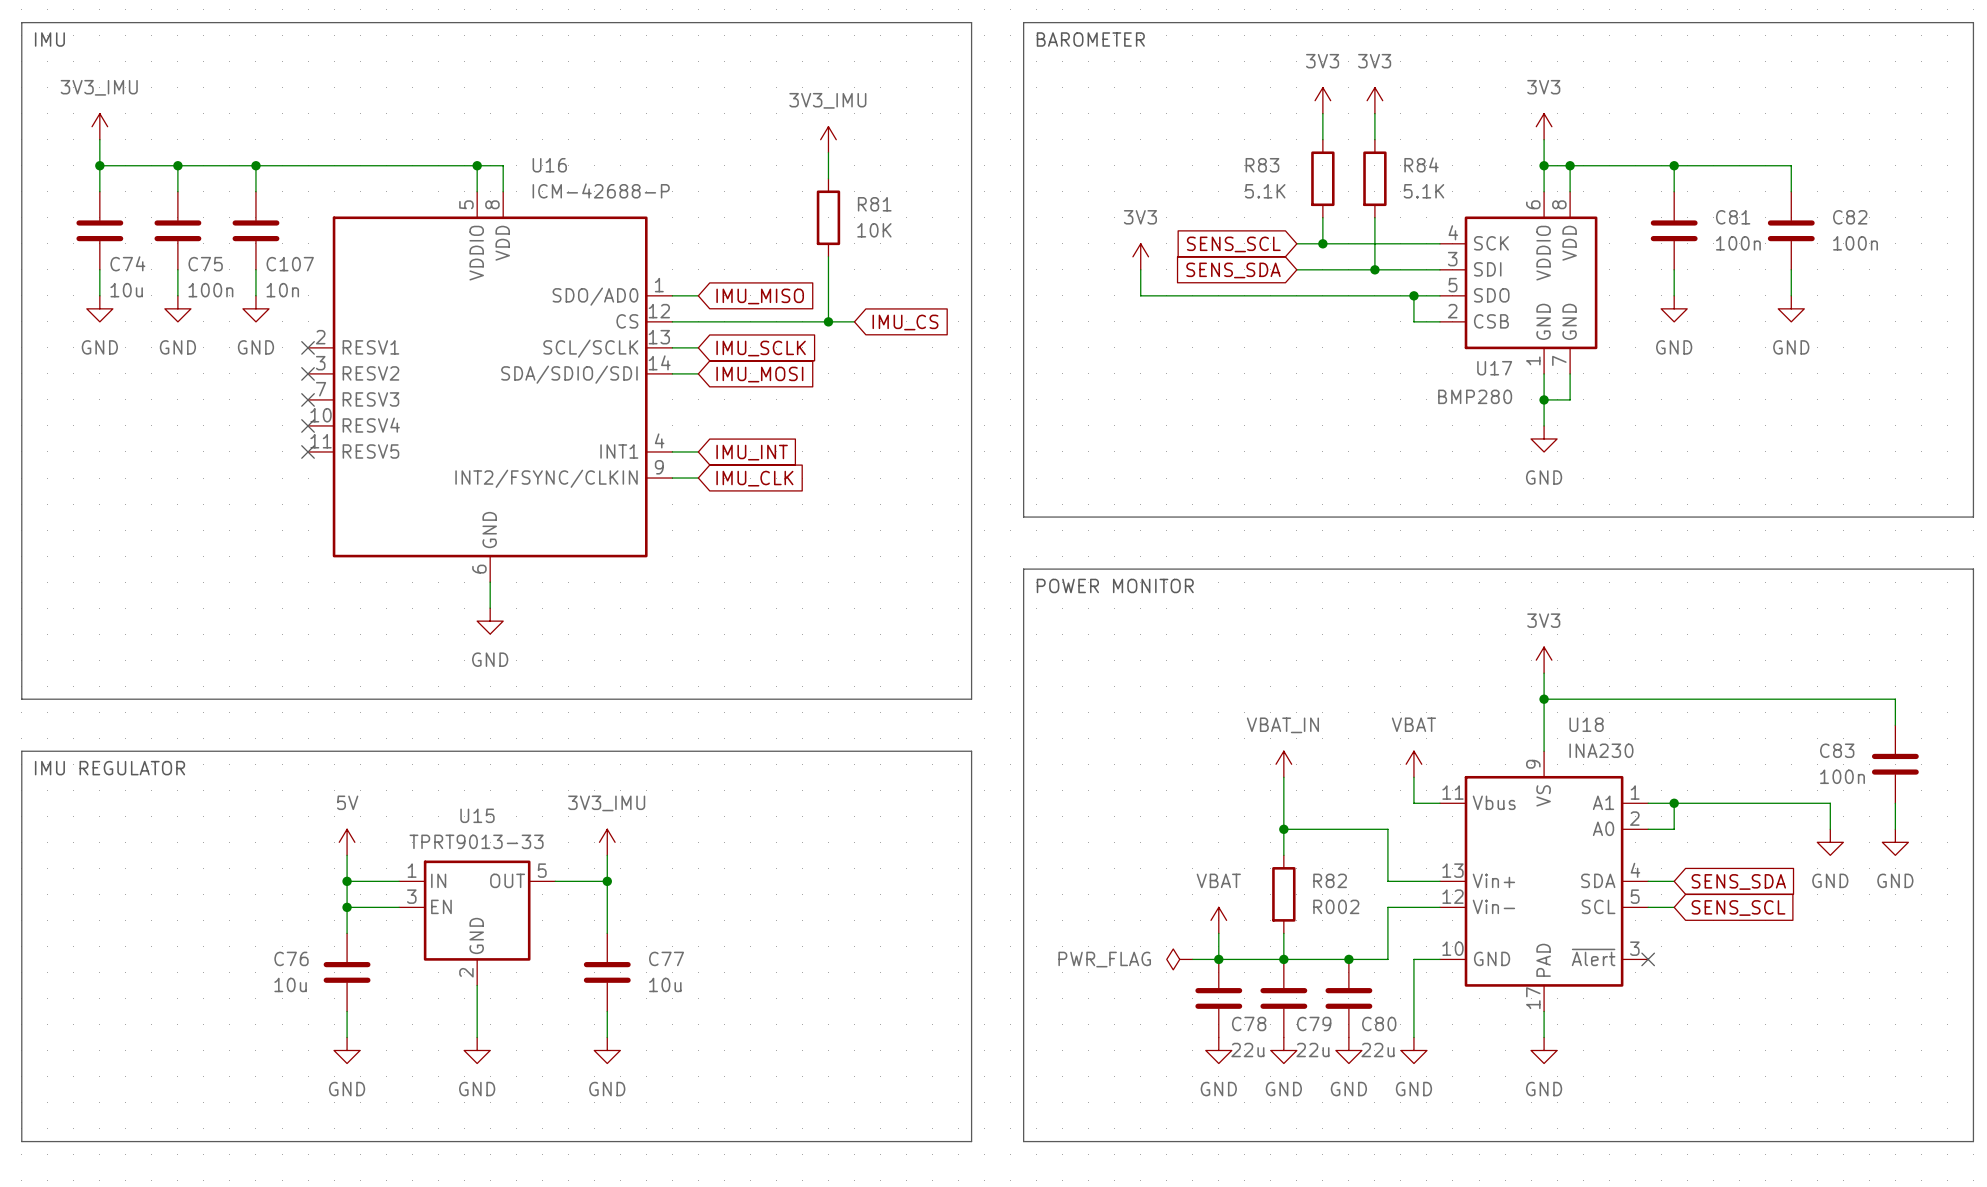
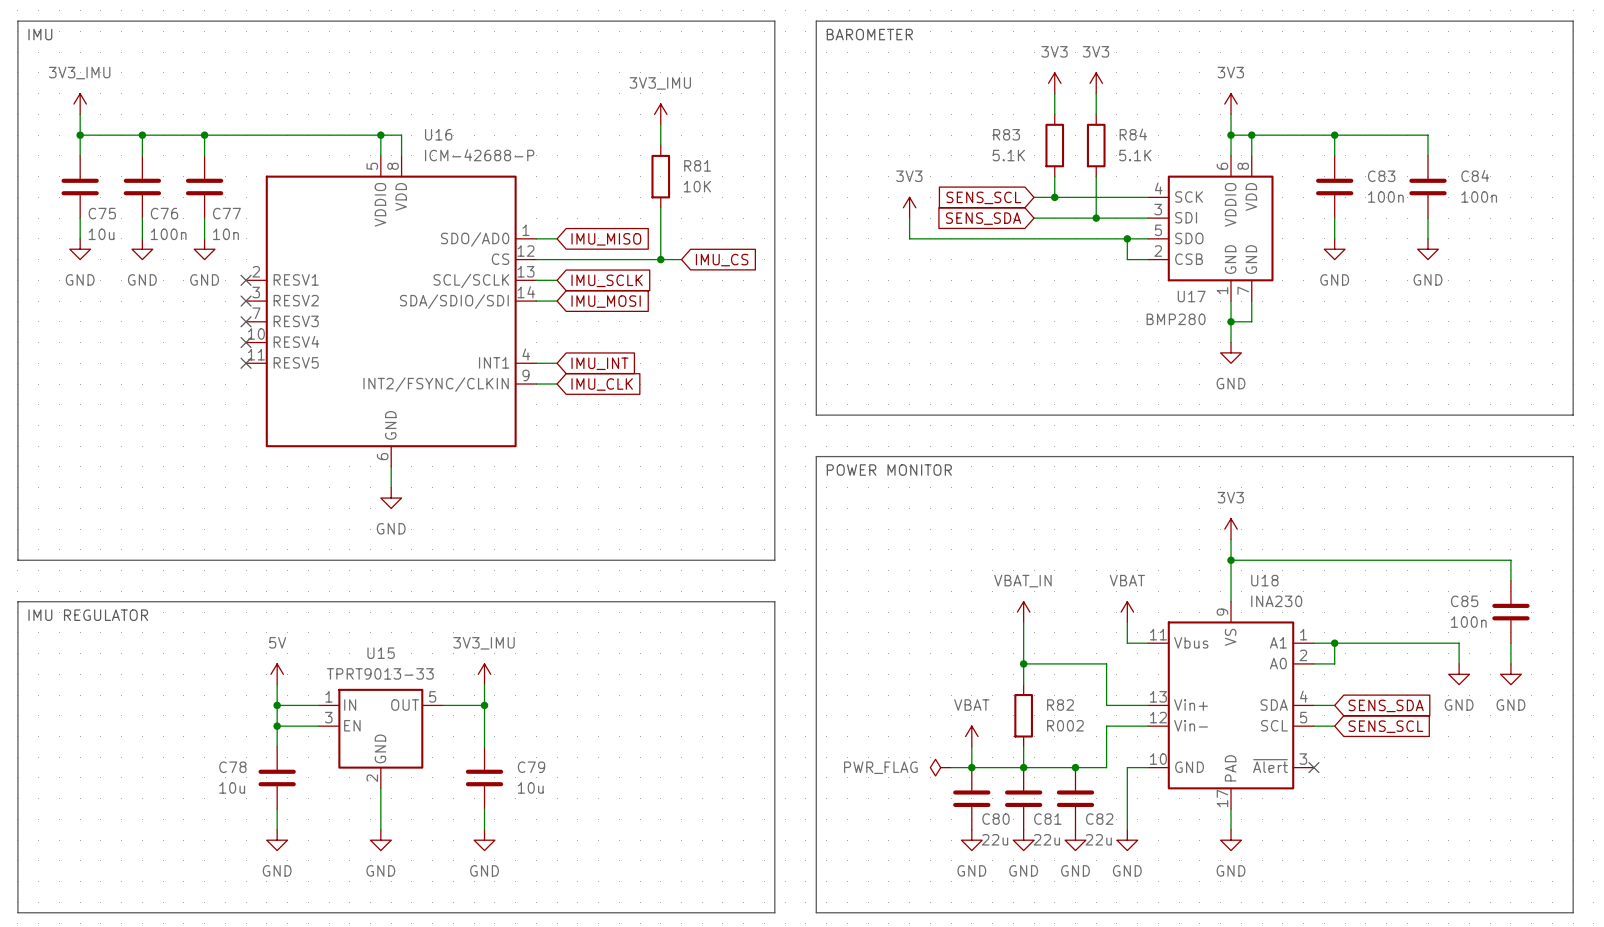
C81 name: C81 (1733, 217) -> C83 (1381, 176)
C82 name: C82 (1850, 217) -> C84 (1475, 176)
C74 name: C74 (127, 263) -> C75 (102, 213)
C75 name: C75 (205, 264) -> C76 (164, 213)
C107 name: C107 (290, 264) -> C77 (226, 213)
C83 name: C83 (1837, 750) -> C85 (1464, 601)
C76 name: C76 (291, 958) -> C78 (232, 767)
C77 name: C77 (666, 958) -> C79 (531, 767)
C78 name: C78 (1249, 1023) -> C80 (995, 819)
C79 name: C79 (1314, 1023) -> C81 (1047, 819)
C80 name: C80 (1379, 1023) -> C82 (1099, 819)

